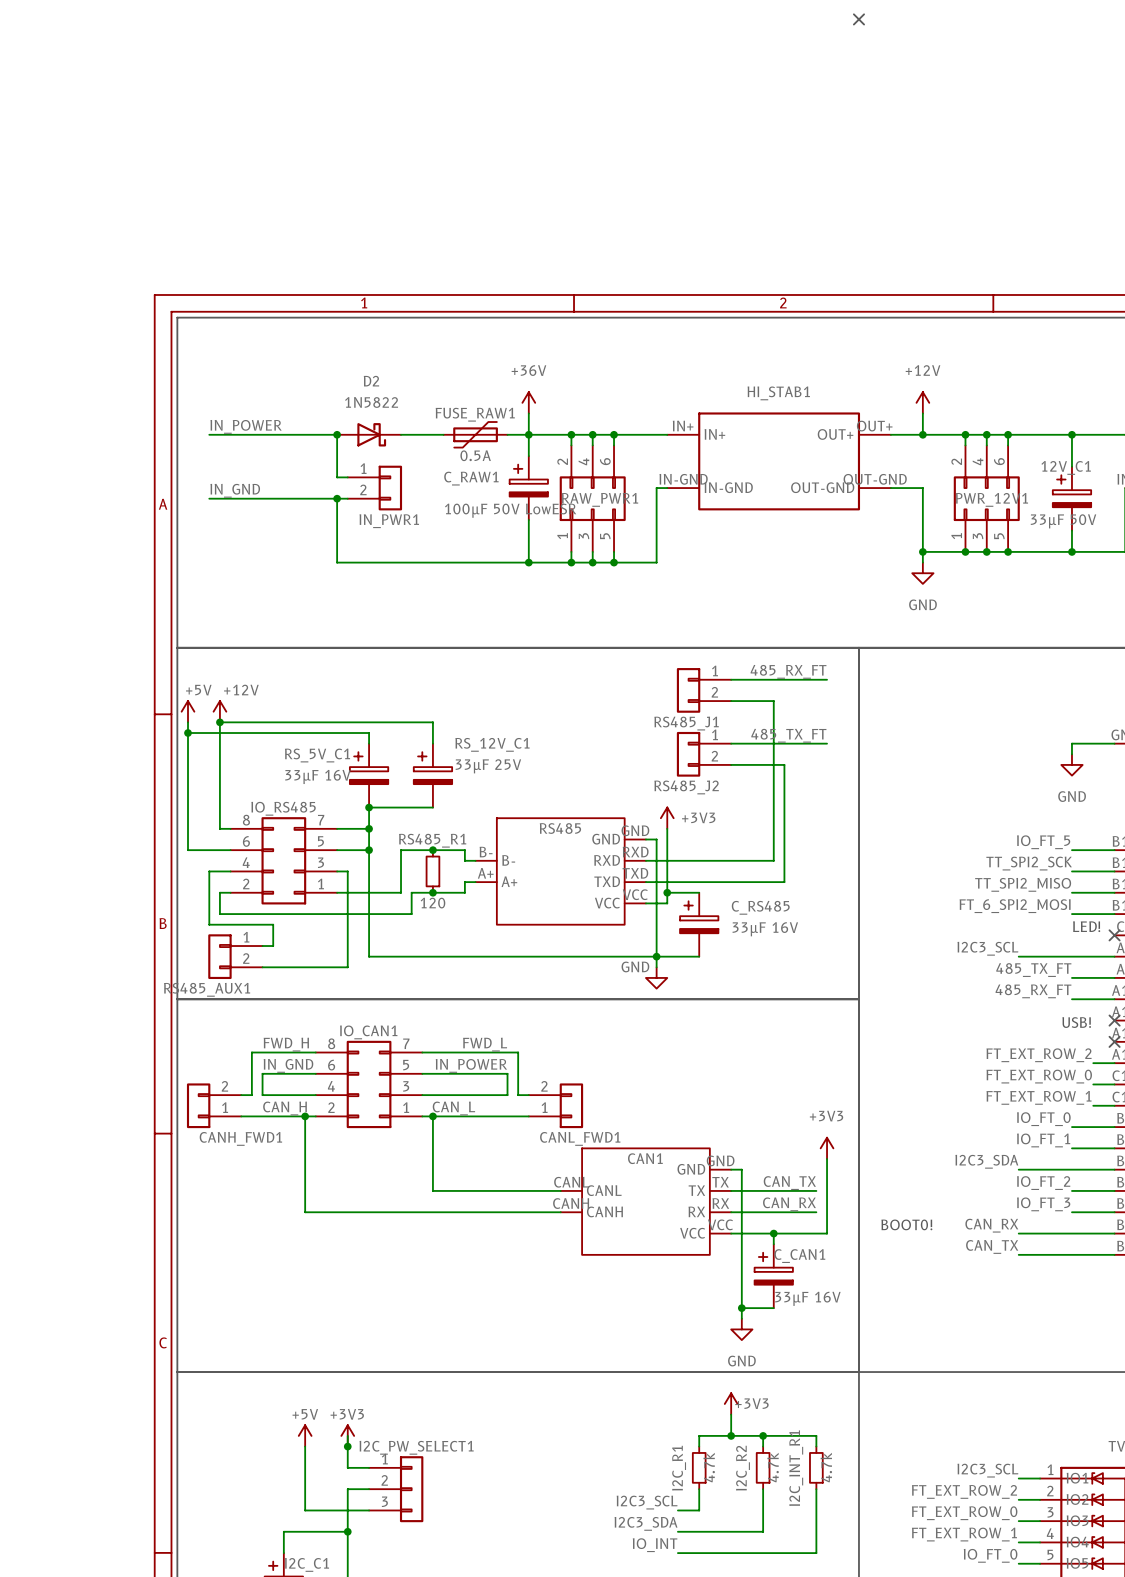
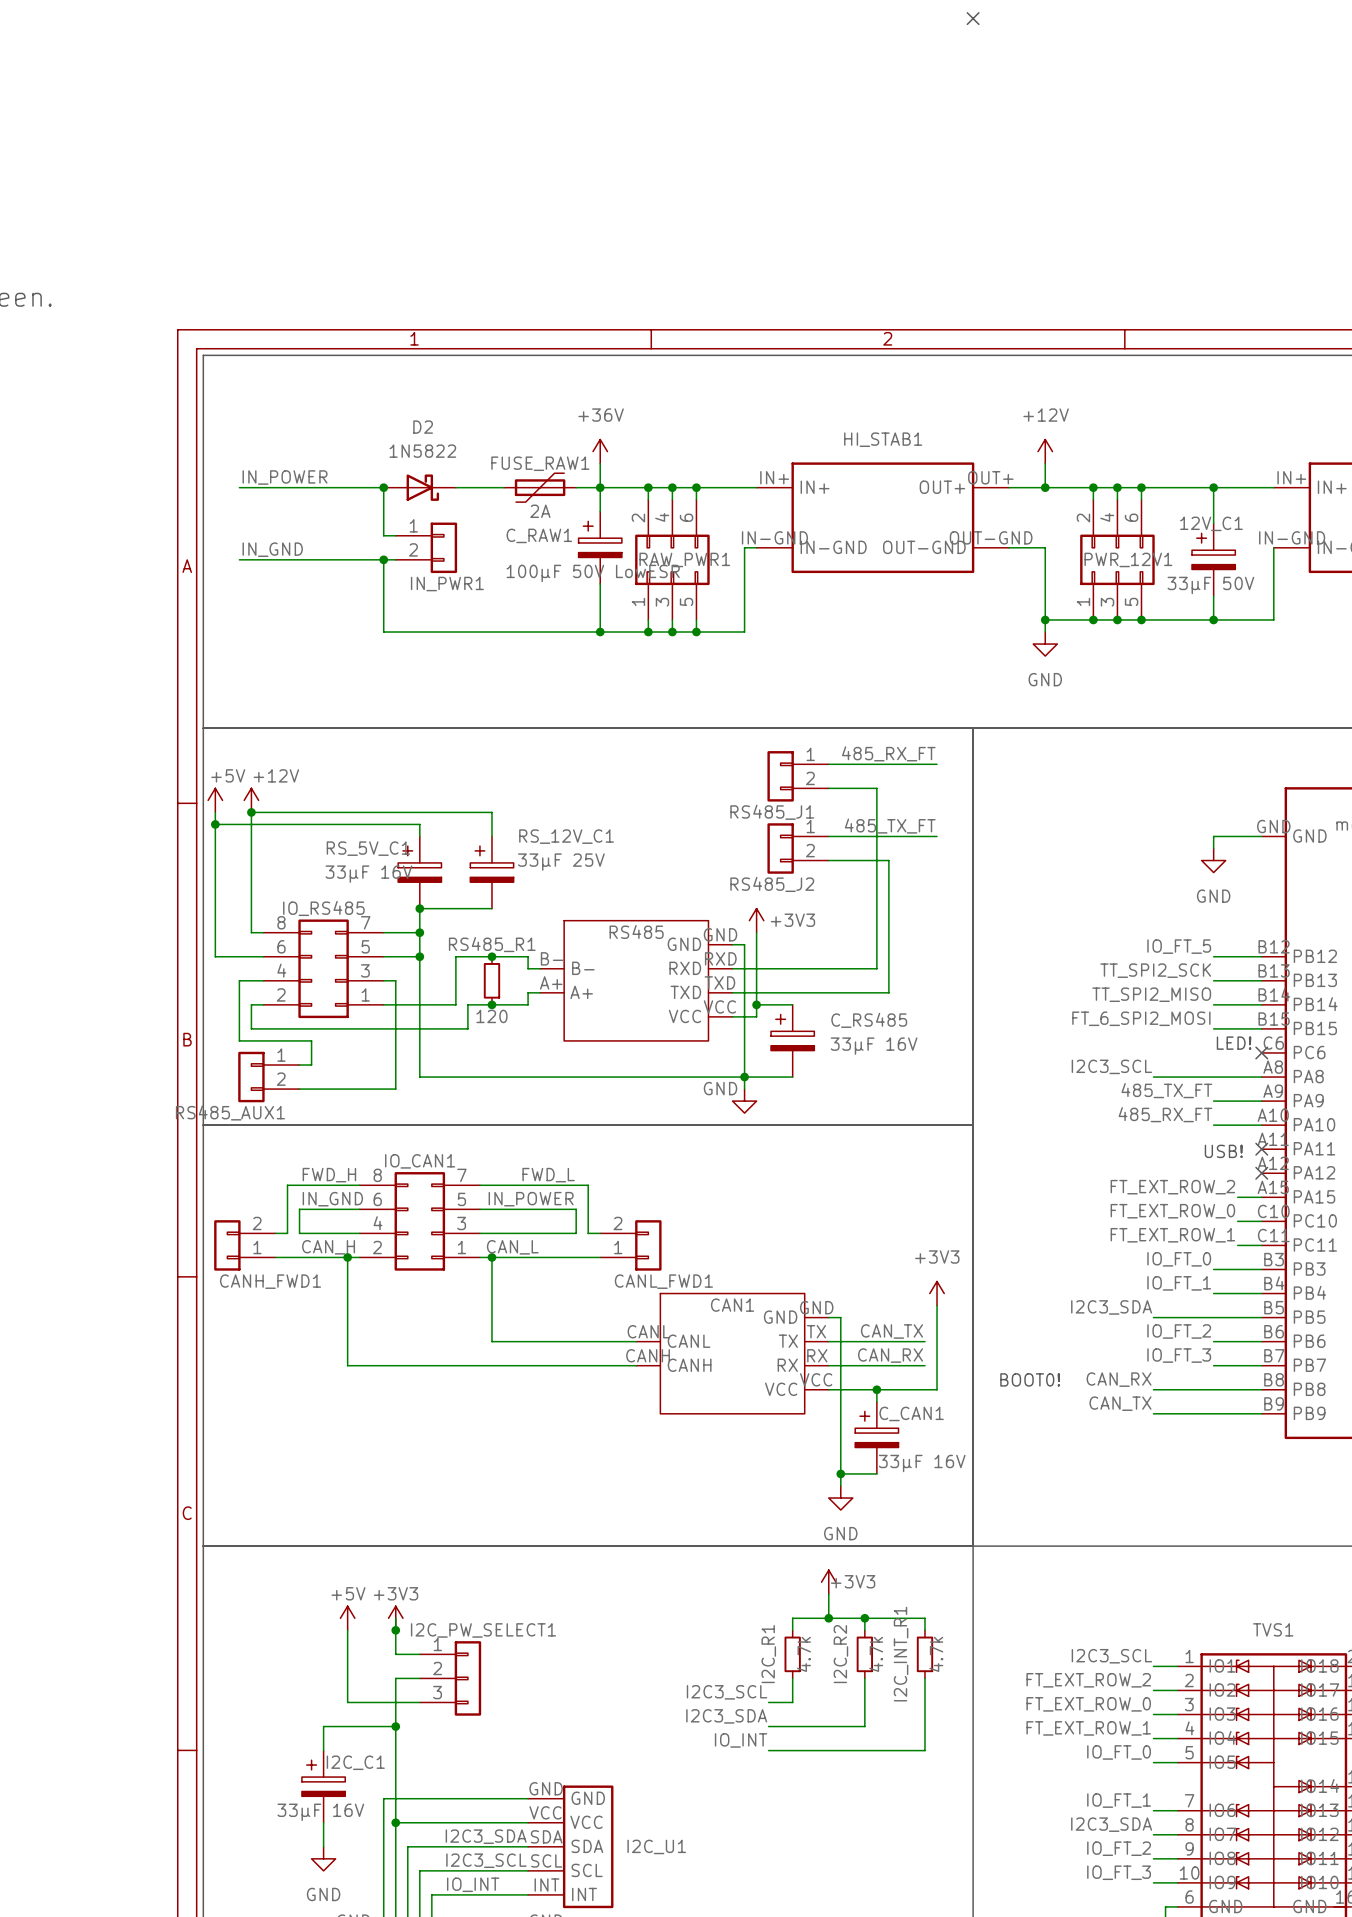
FUSE_RAW1 value: 0.5A (475, 455) -> 2A (540, 511)

